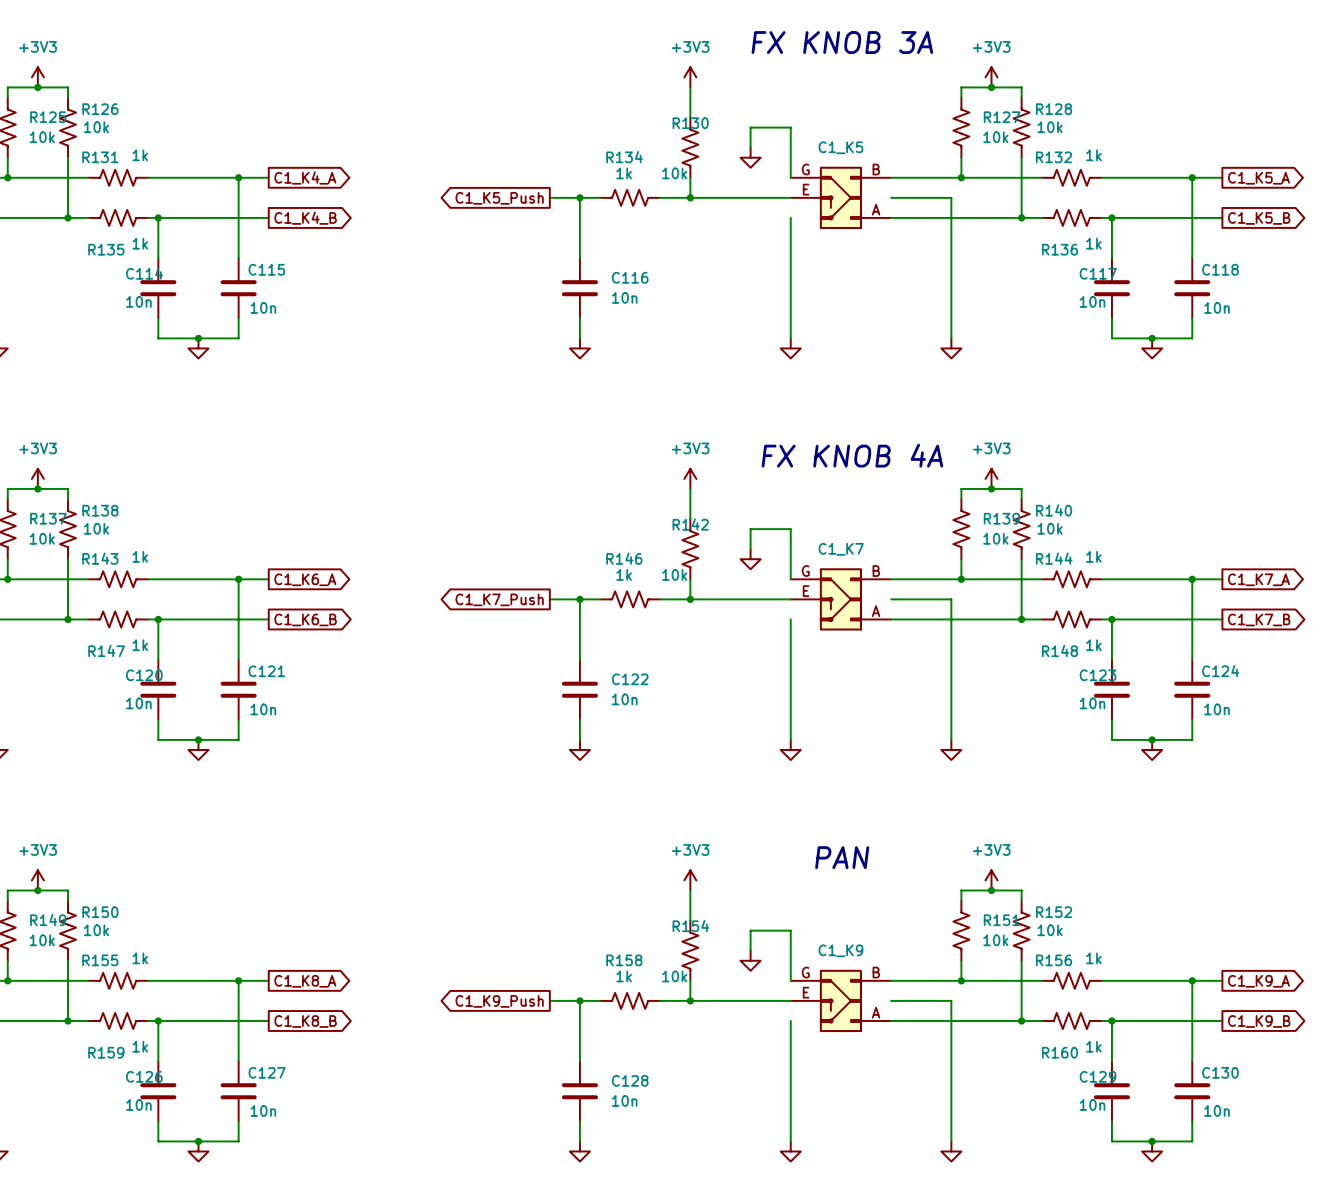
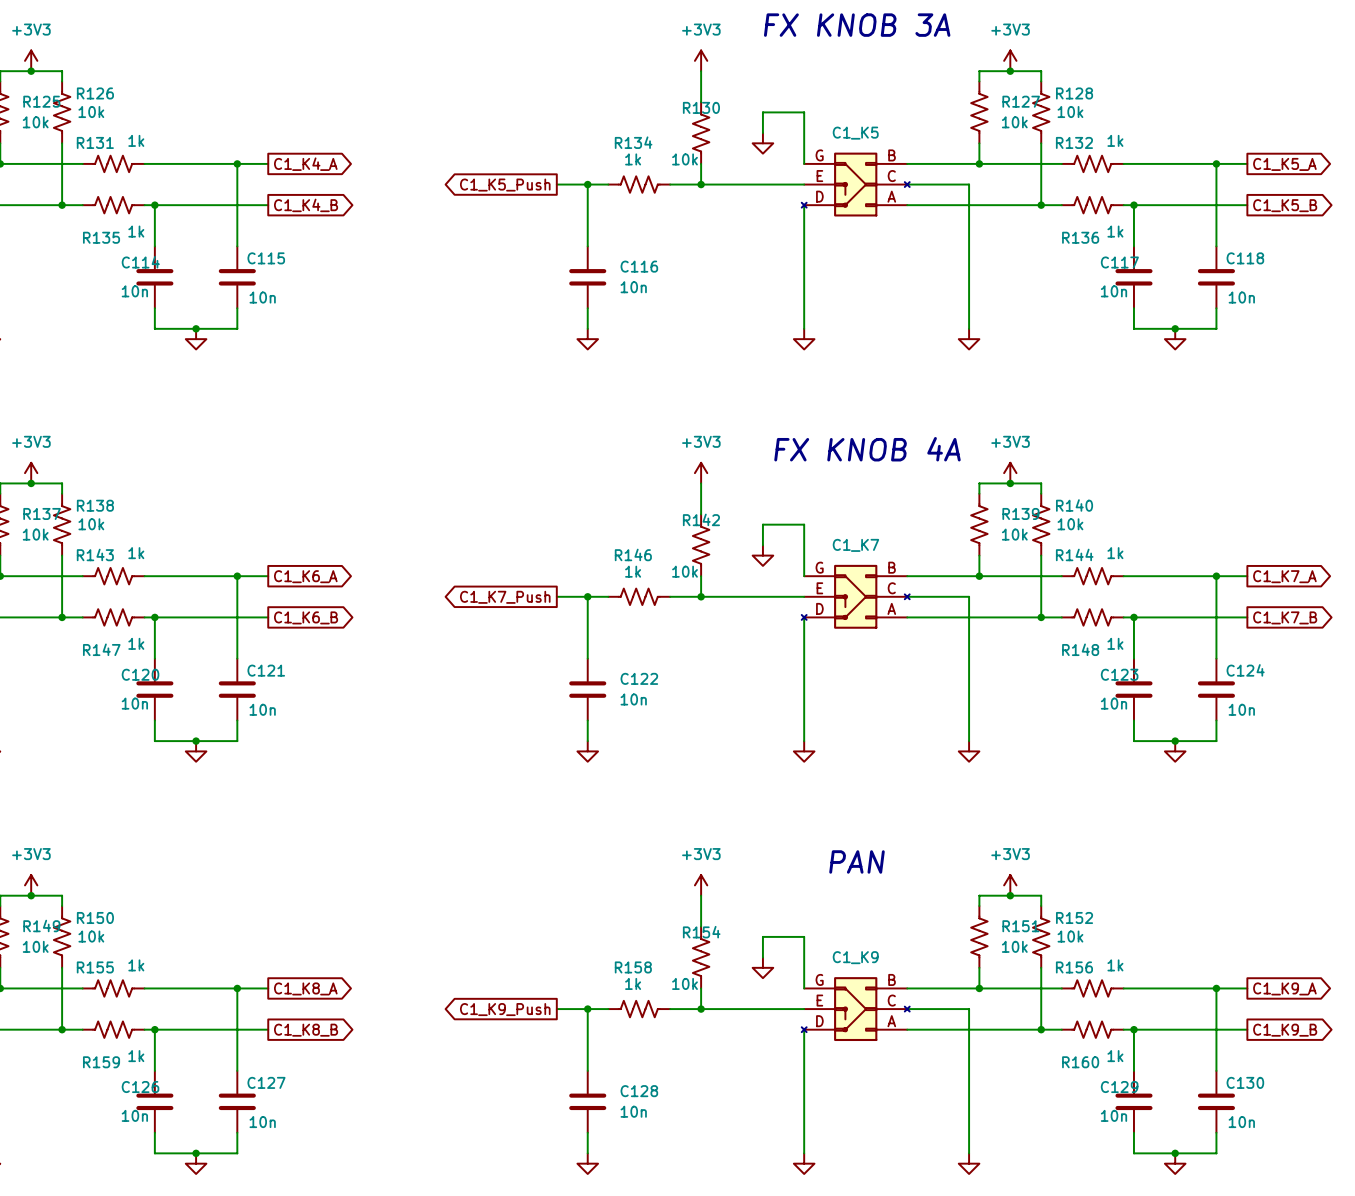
part symbol: [790, 166, 892, 229] -> [801, 152, 910, 217]
part symbol: [790, 568, 892, 631] -> [801, 564, 910, 629]
part symbol: [790, 969, 892, 1033] -> [801, 977, 910, 1042]

